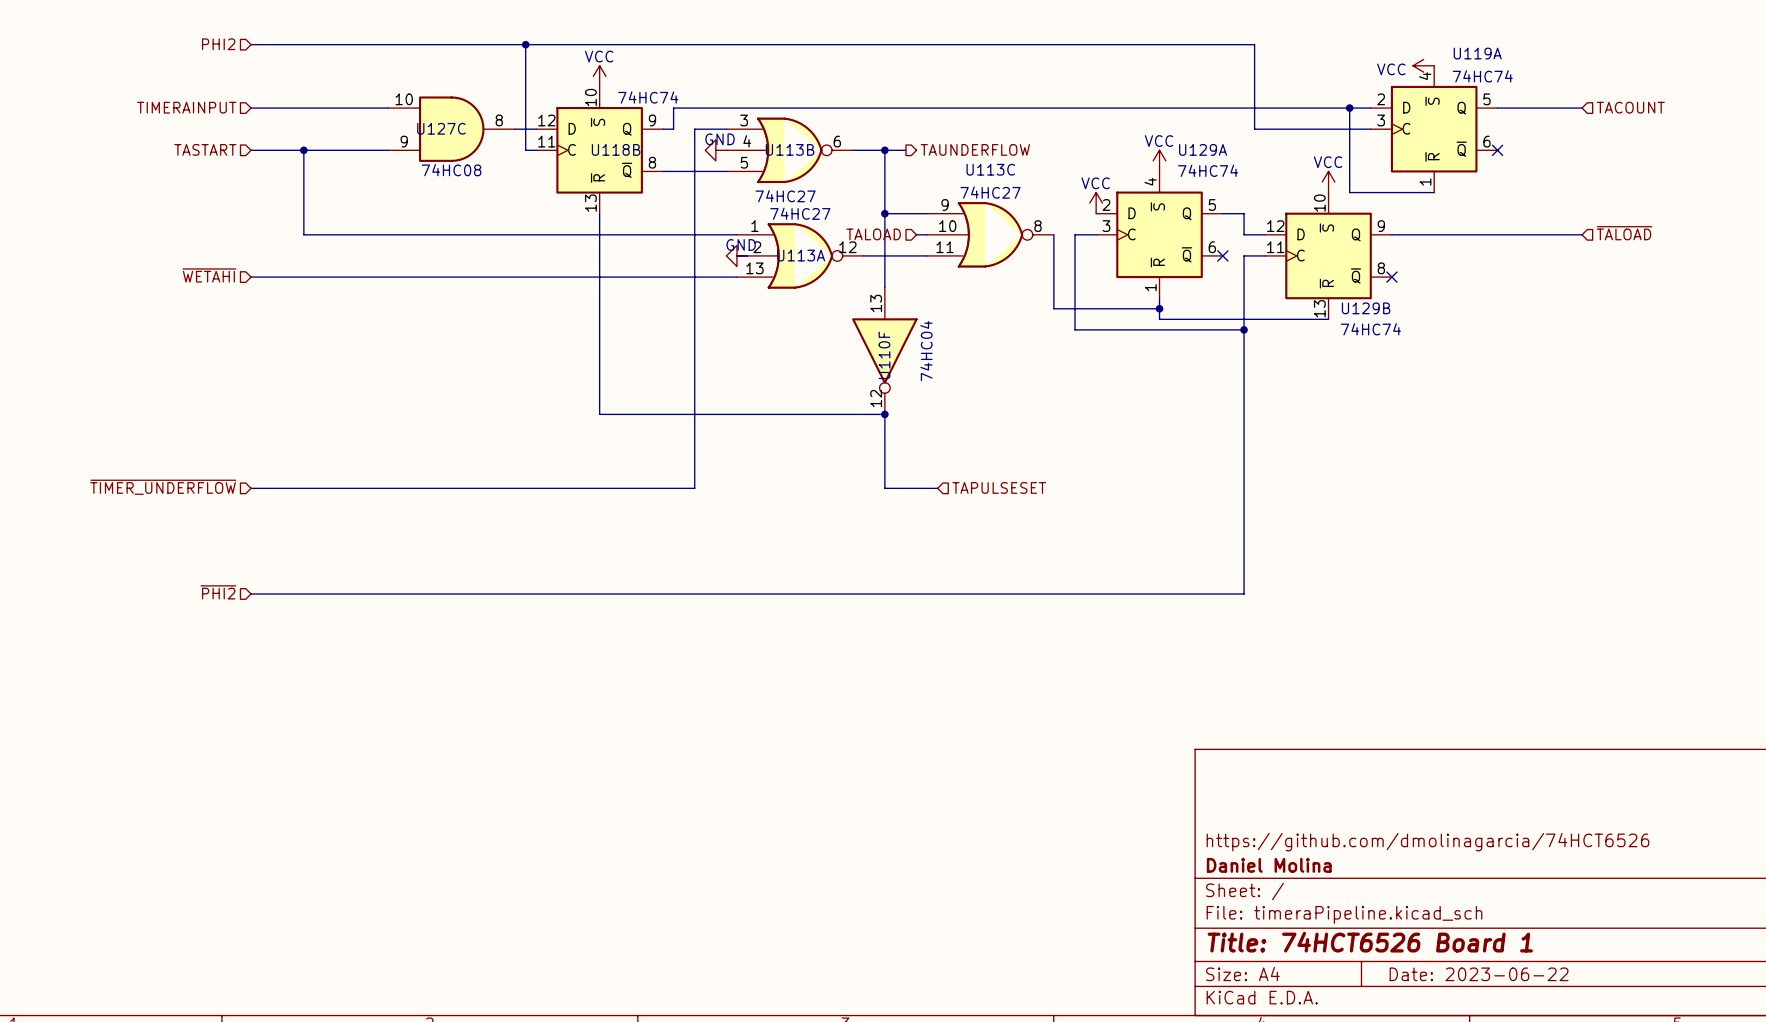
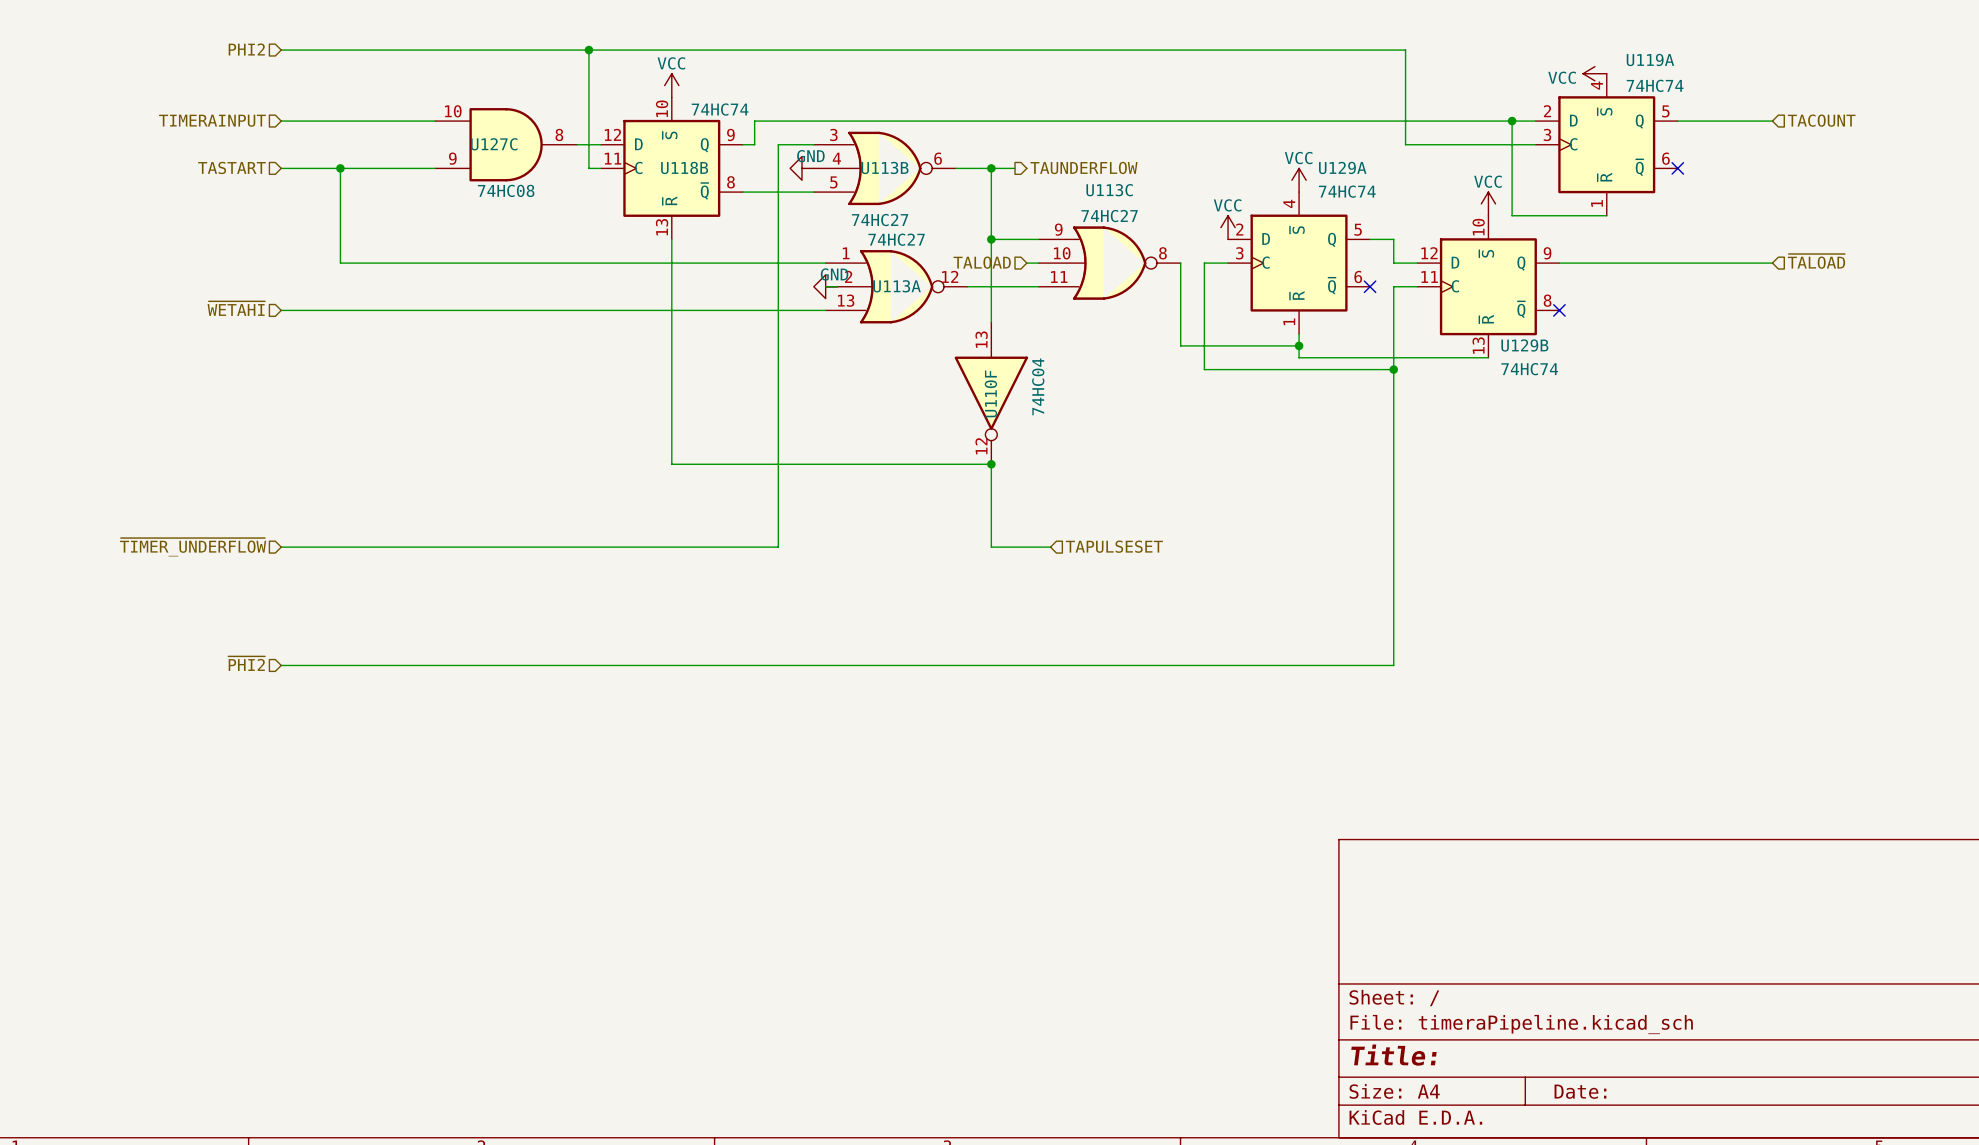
title block: https://github.com/dmolinagarcia/74HCT6526 (1427, 842) -> none
title block: Daniel Molina (1269, 865) -> none
title block: Title: 74HCT6526 Board 1 (1370, 942) -> Title: (1393, 1055)
title block: Date: 2023-06-22 (1479, 974) -> Date: (1580, 1091)

